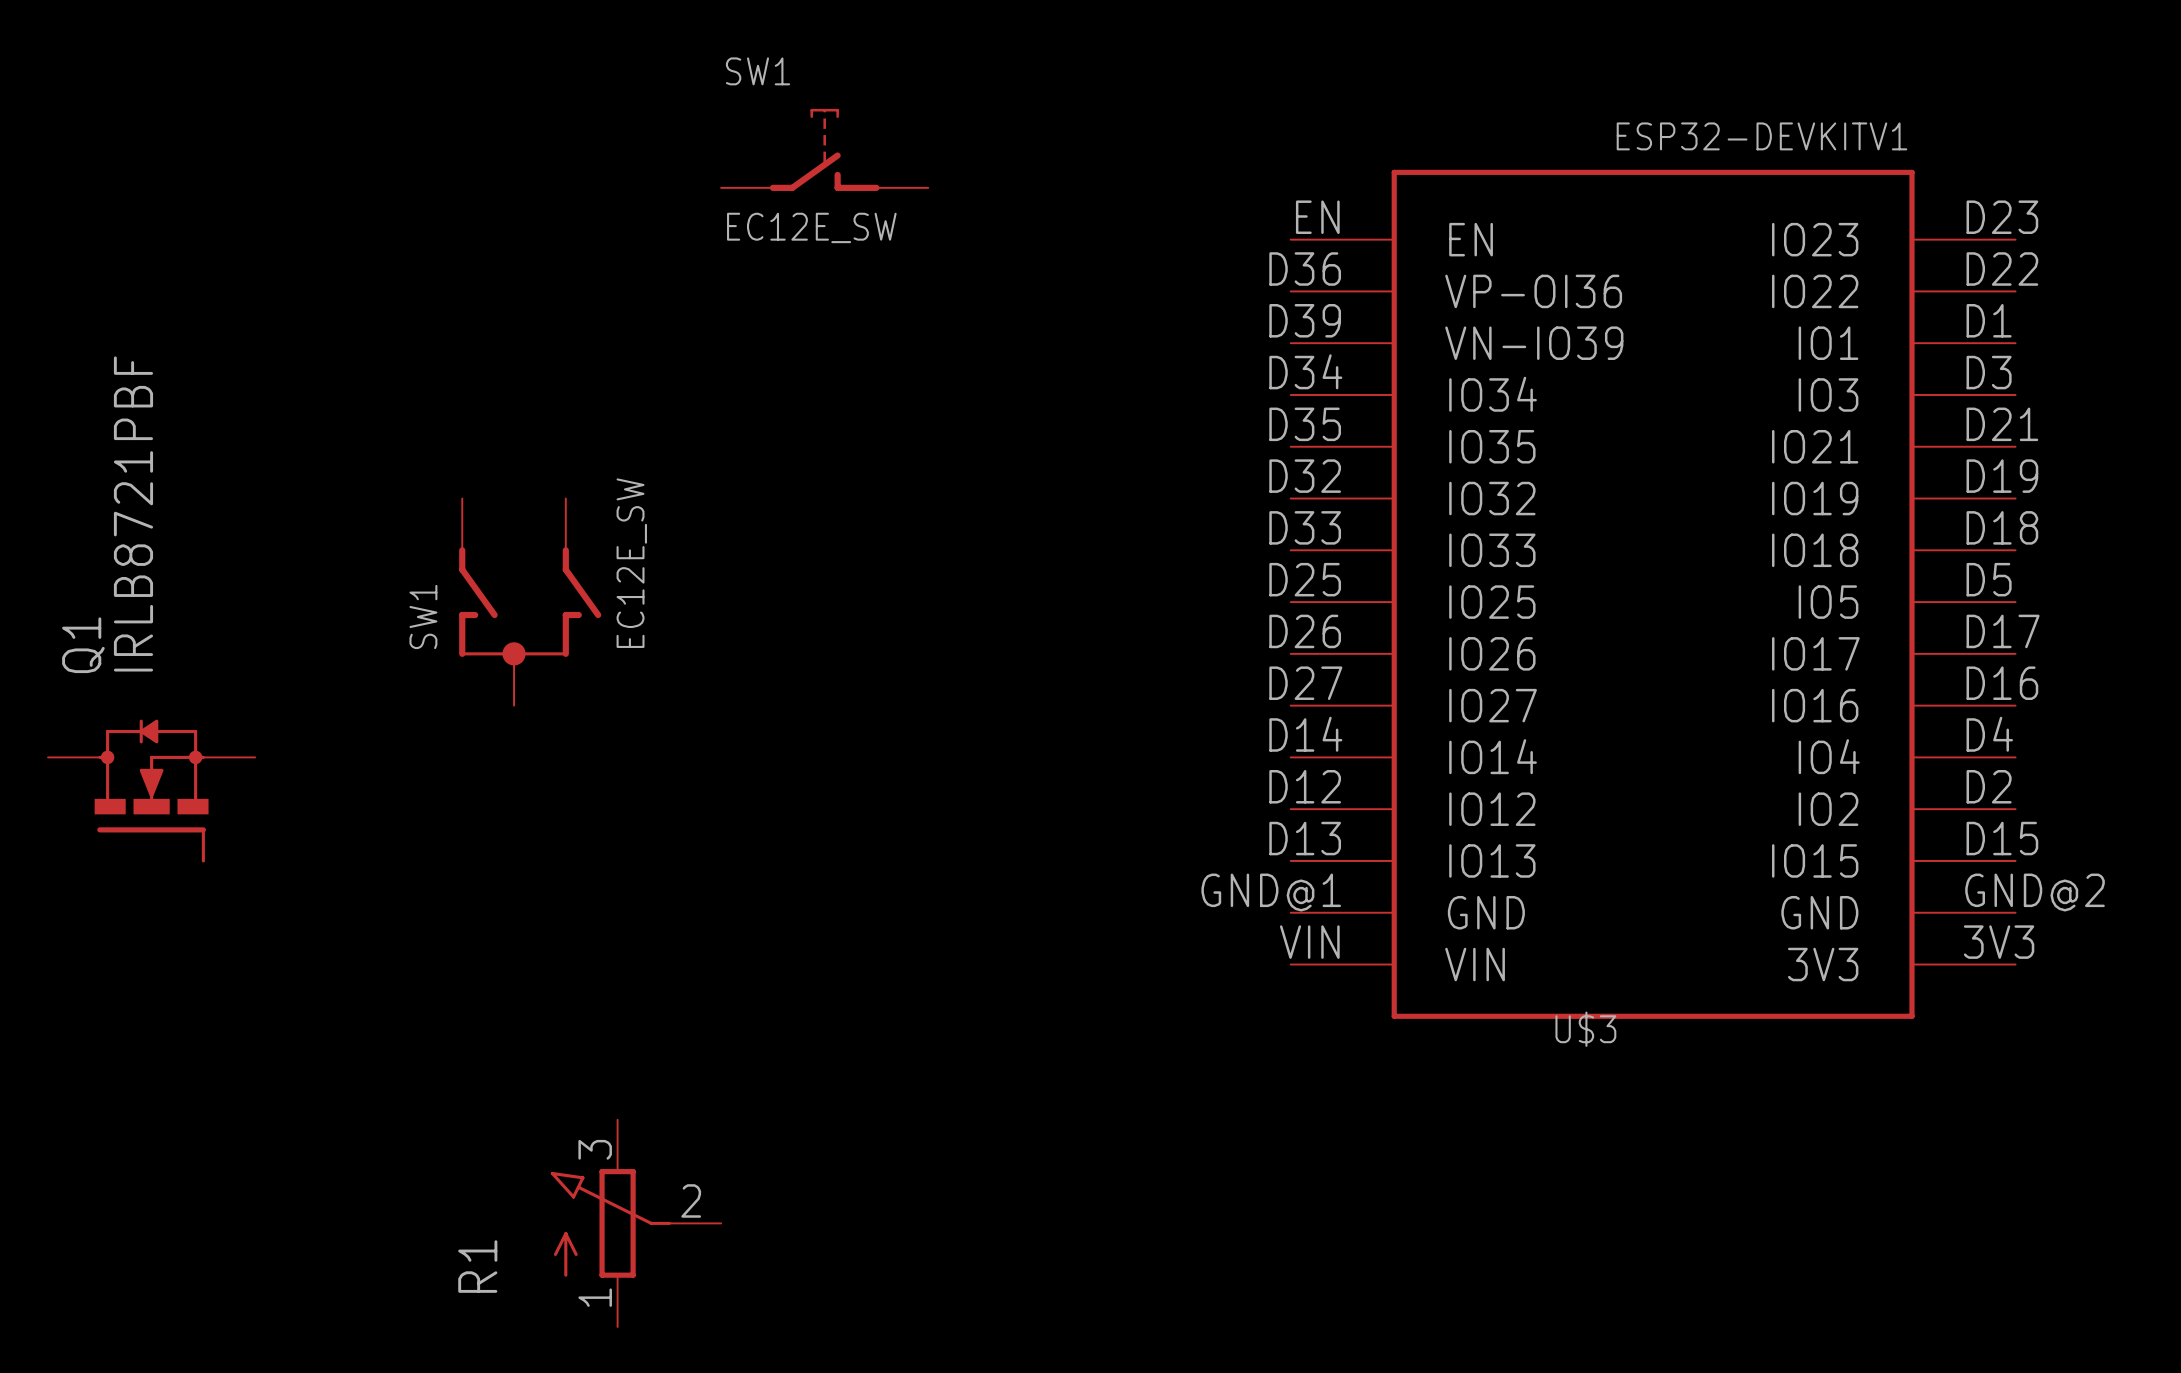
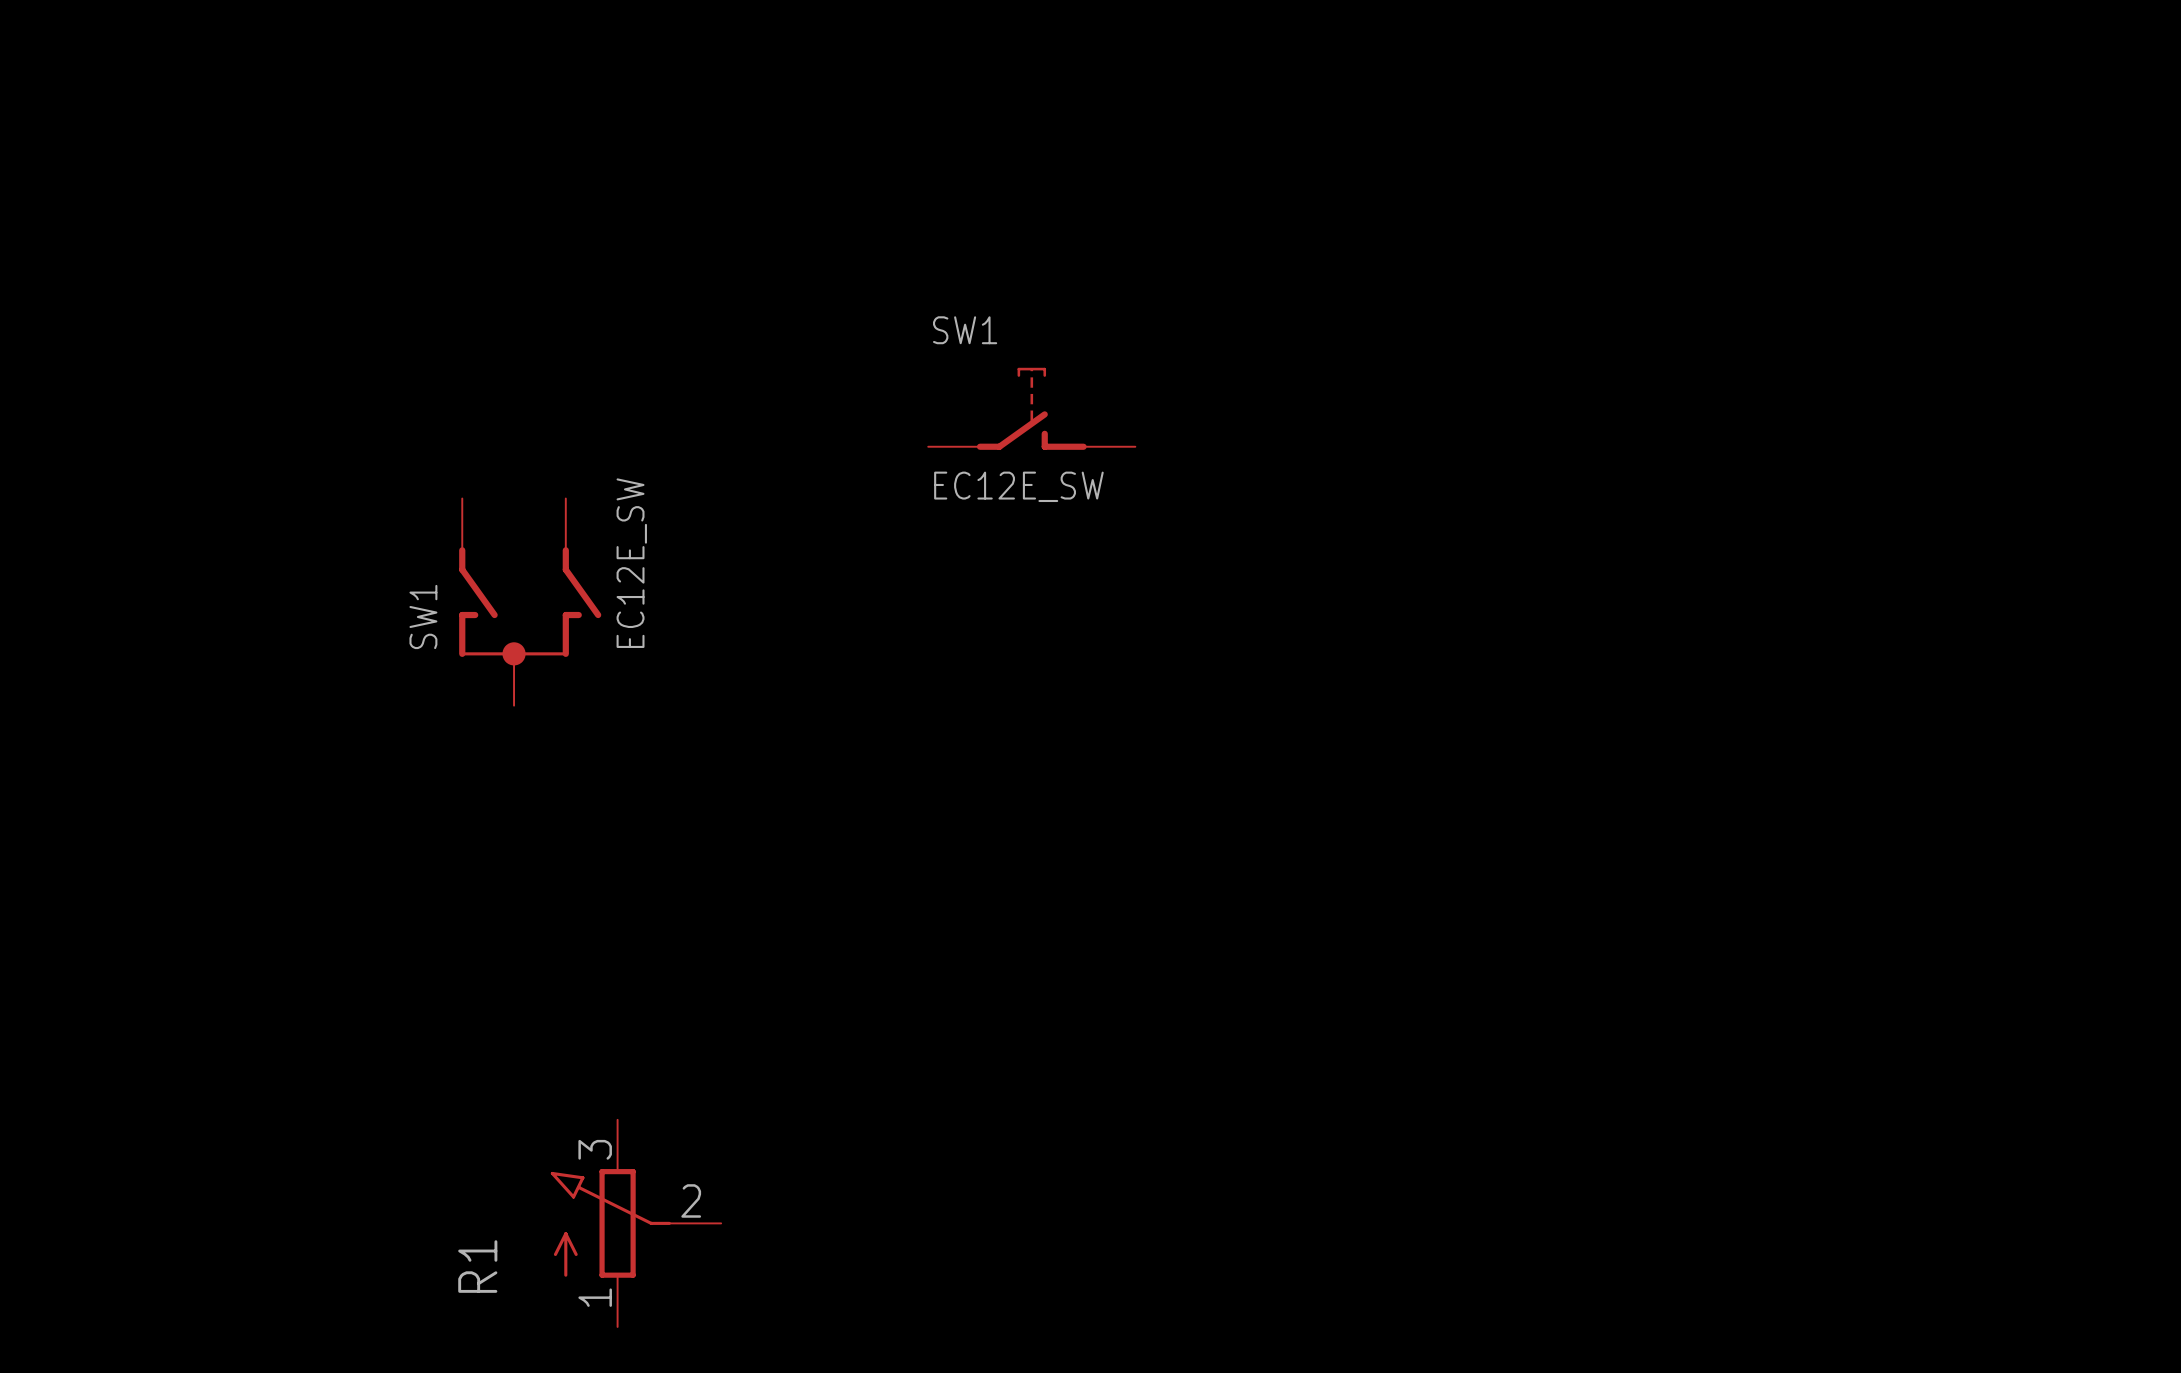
SW1 position: (824, 149) -> (1031, 408)
U$3: (1653, 594) -> none
Q1: IRLB8721PBF (151, 791) -> none

